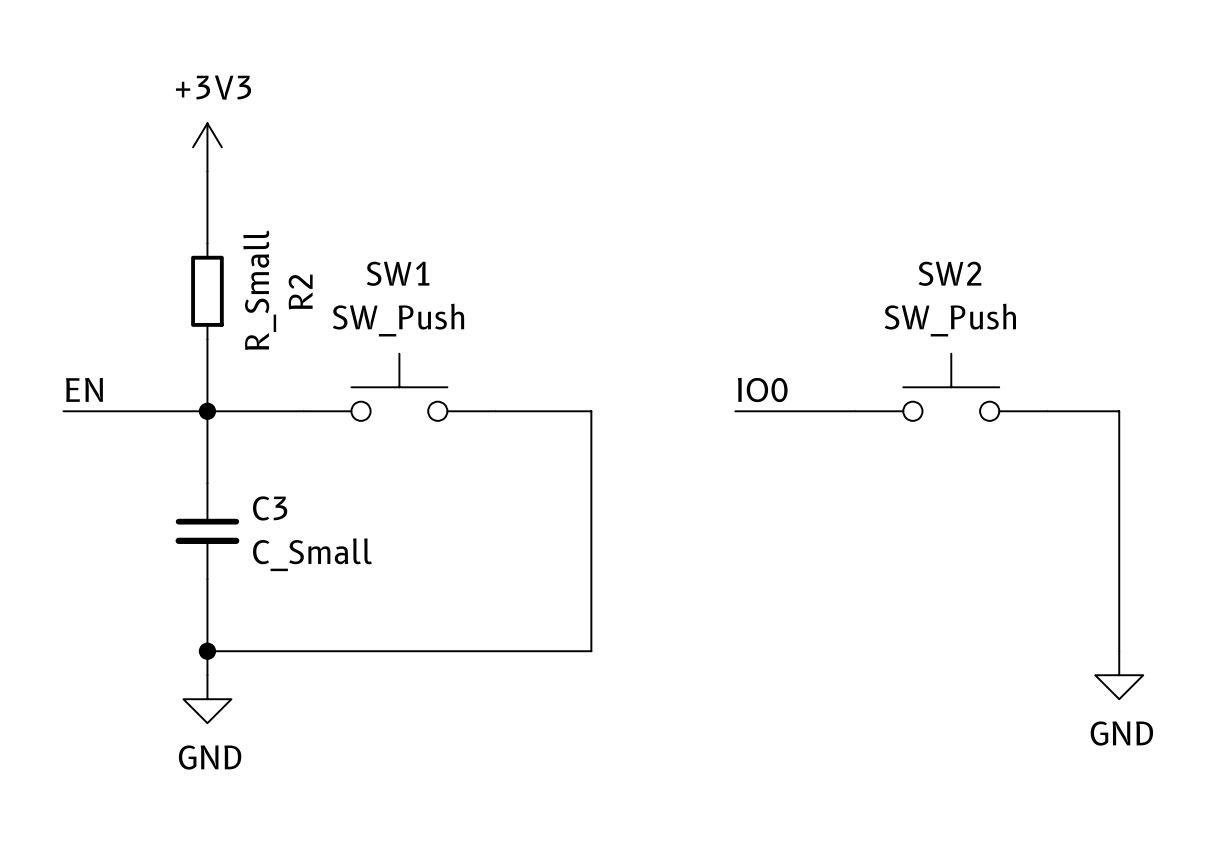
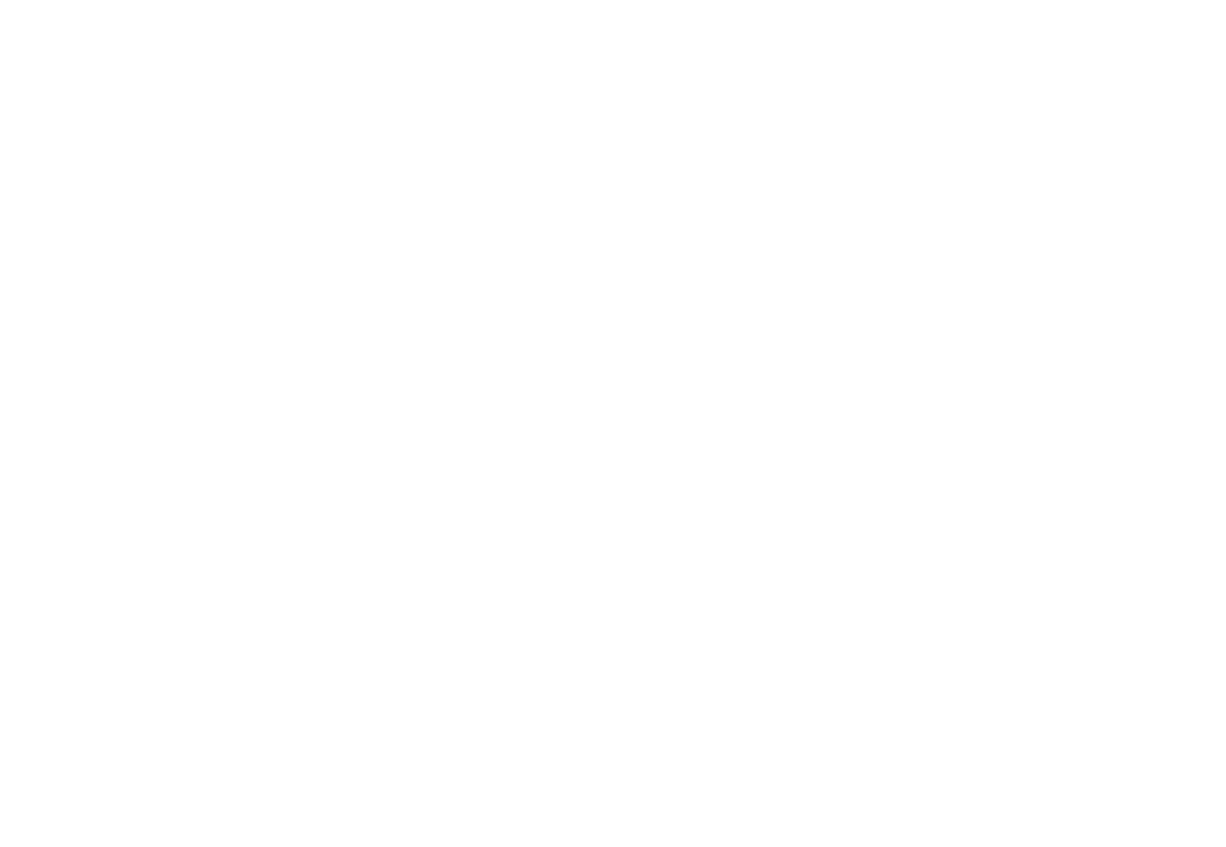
power symbol: +3V3 (207, 147) -> none
wire: (207, 171) (207, 243) -> none
R2: R_Small (207, 291) -> none
wire: (207, 339) (207, 483) -> none
SW1: SW_Push (399, 387) -> none
SW2: SW_Push (951, 387) -> none
label: EN (84, 389) -> none
label: IO0 (762, 390) -> none
wire: (63, 411) (303, 411) -> none
junction: (207, 411) -> none
wire: (495, 411) (591, 411) (591, 651) (207, 651) -> none
wire: (735, 411) (855, 411) -> none
wire: (1047, 411) (1119, 411) (1119, 651) -> none
C3: C_Small (207, 531) -> none
wire: (207, 579) (207, 675) -> none
junction: (207, 651) -> none
power symbol: GND (1119, 675) -> none
power symbol: GND (207, 699) -> none

